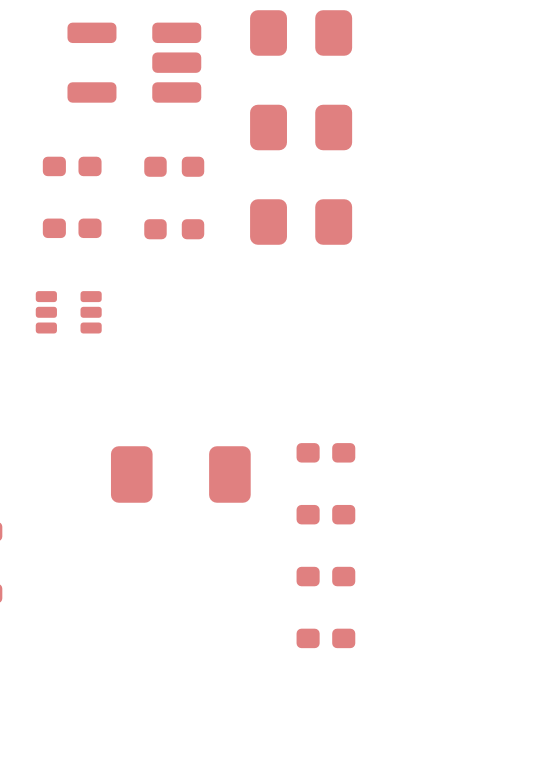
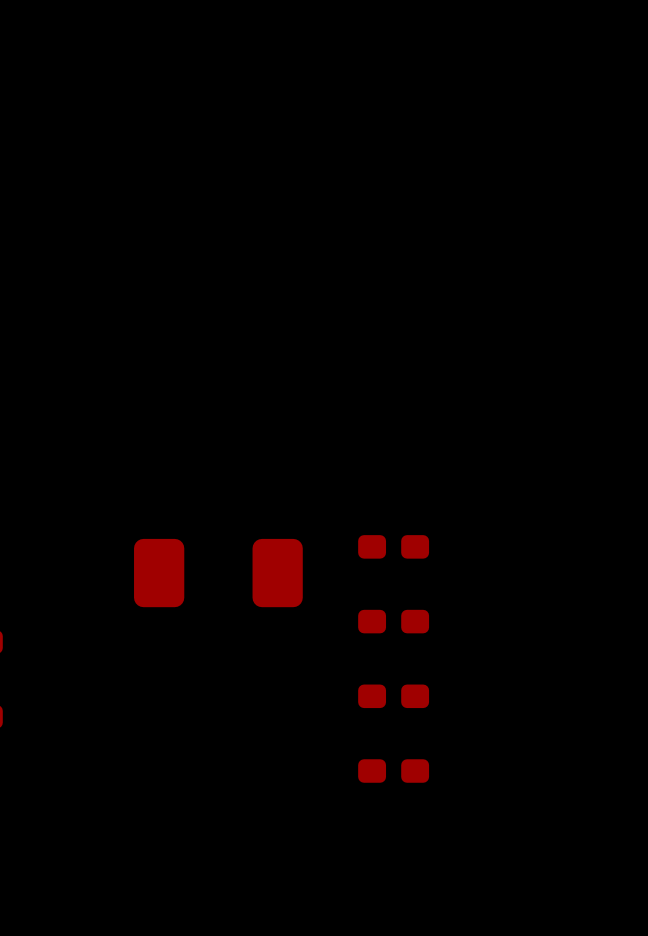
part: (301, 32) -> none
part: (134, 62) -> none
part: (301, 127) -> none
part: (72, 166) -> none
part: (174, 166) -> none
part: (301, 222) -> none
part: (72, 228) -> none
part: (174, 229) -> none
part: (68, 312) -> none

